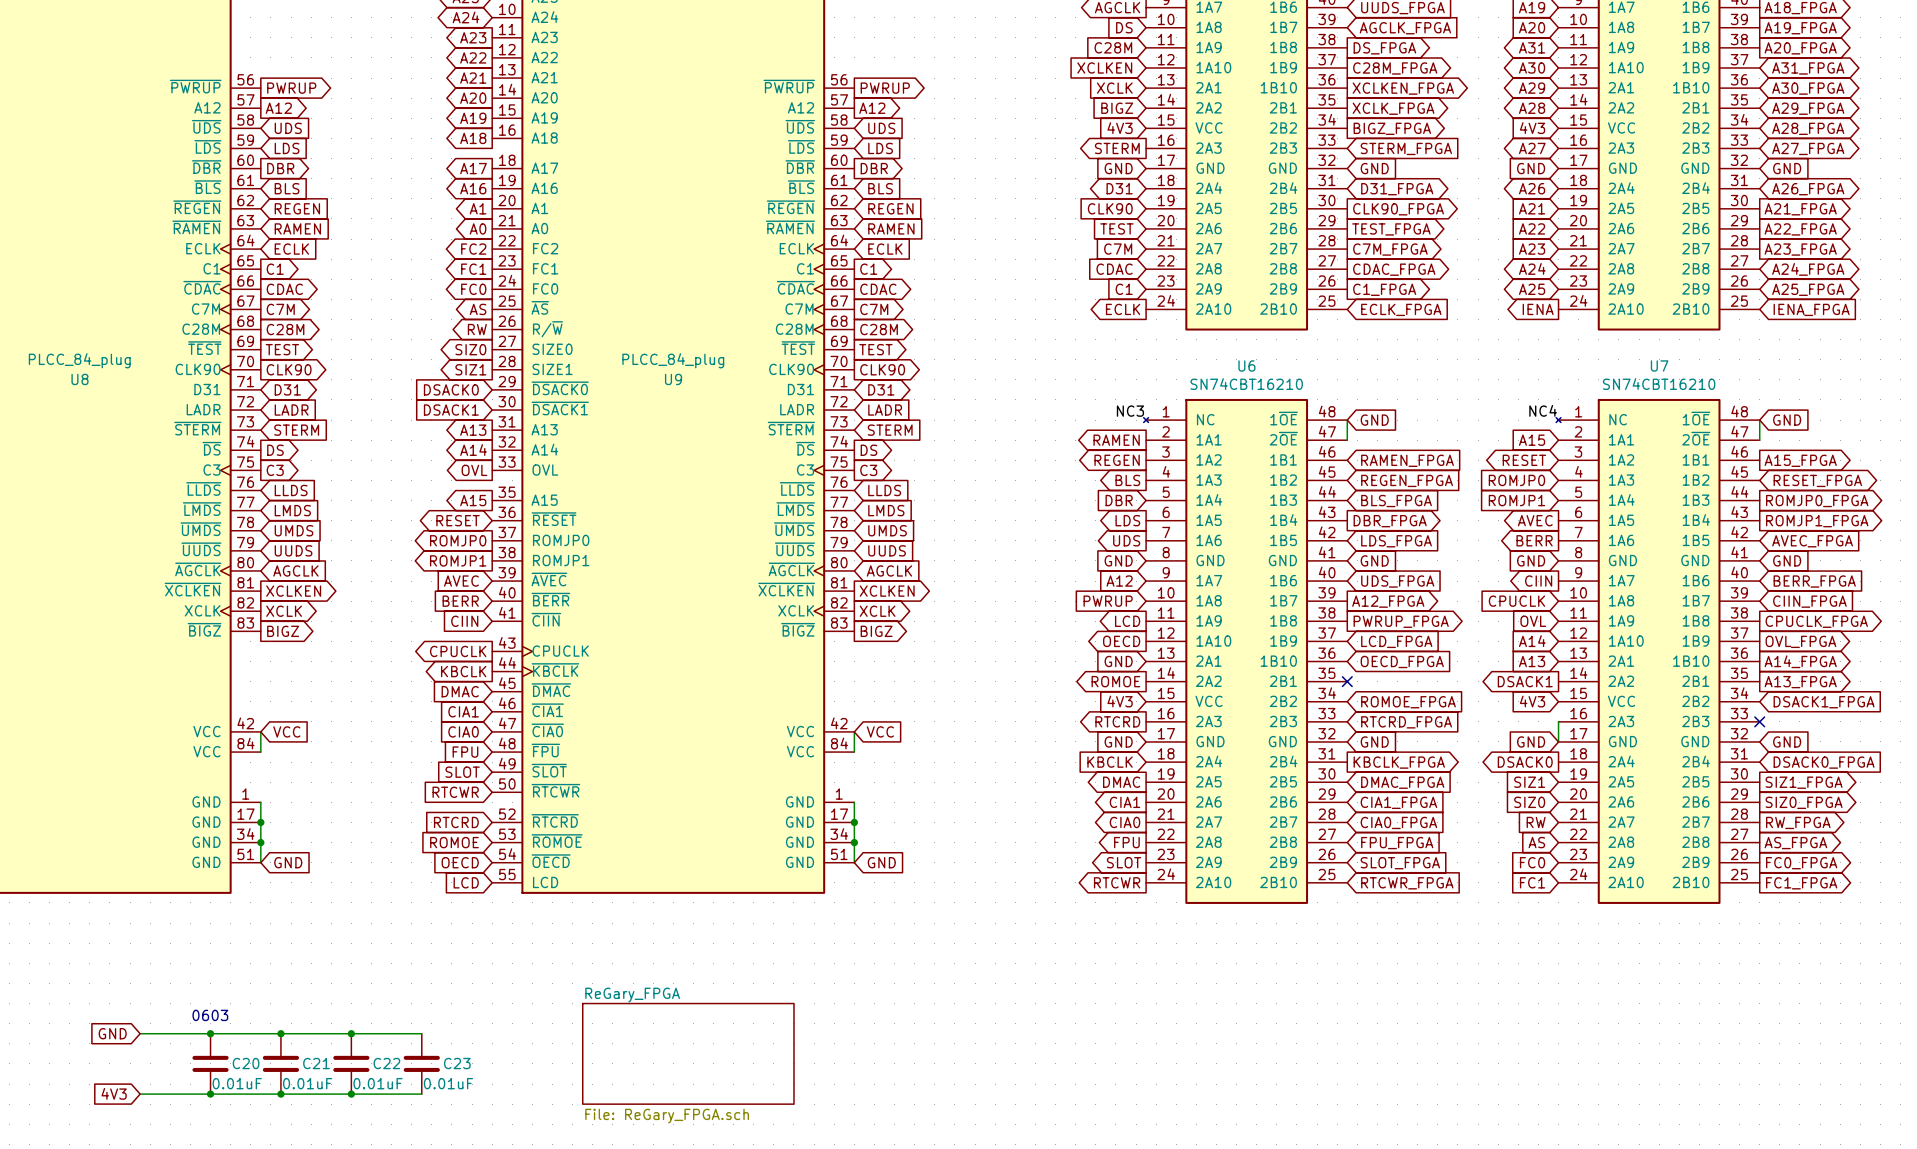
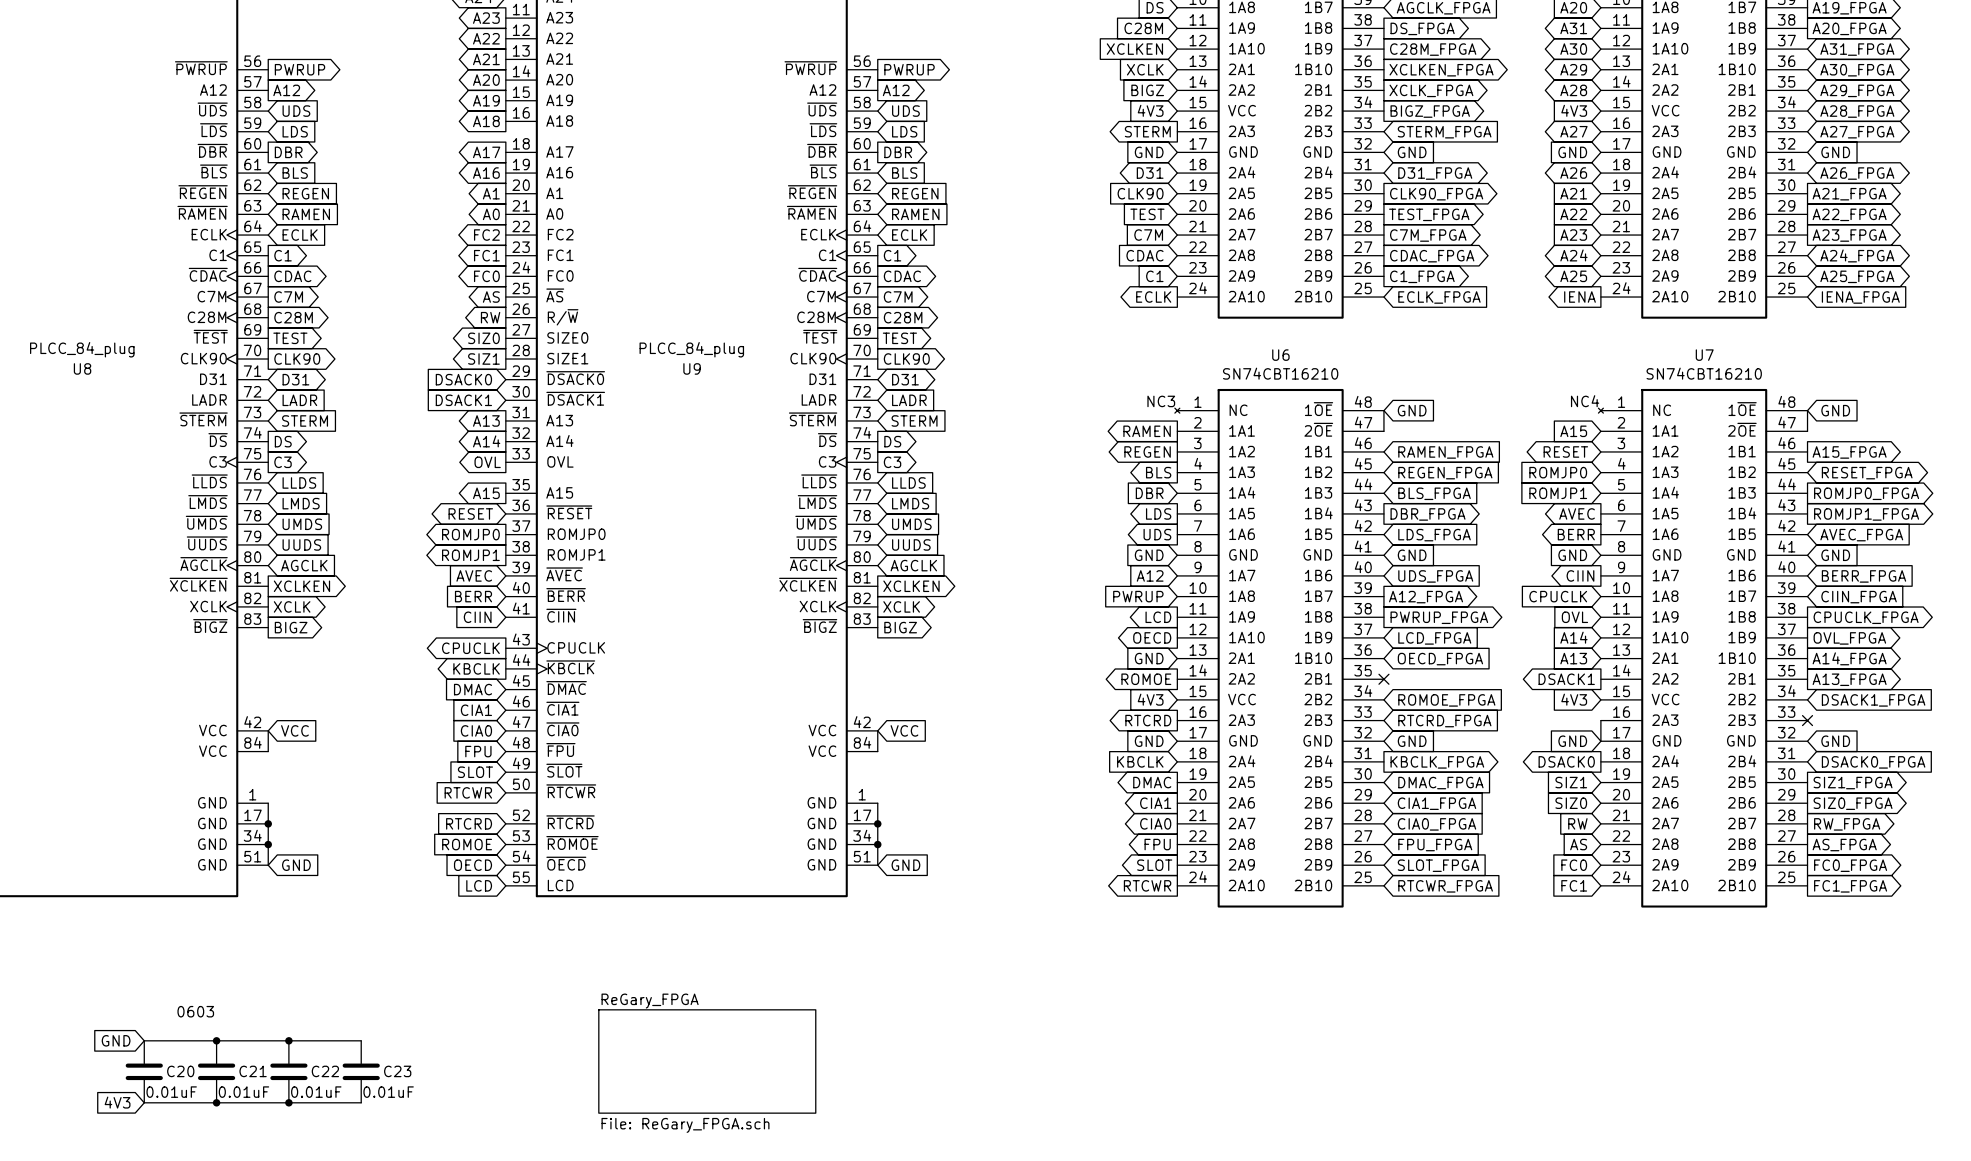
text position: 0603 (210, 1015) -> 0603 (195, 1011)
wire: (351, 1033) (421, 1033) -> none
junction: (351, 1033) -> none
C20: none -> 0.01uF (144, 1071)
C20 name: C20 (246, 1063) -> C21 (253, 1071)
C21 name: C21 (316, 1063) -> C22 (325, 1071)
C22 name: C22 (386, 1063) -> C23 (397, 1071)
C23: 0.01uF (421, 1063) -> none
wire: (351, 1094) (421, 1094) -> none
junction: (351, 1094) -> none

